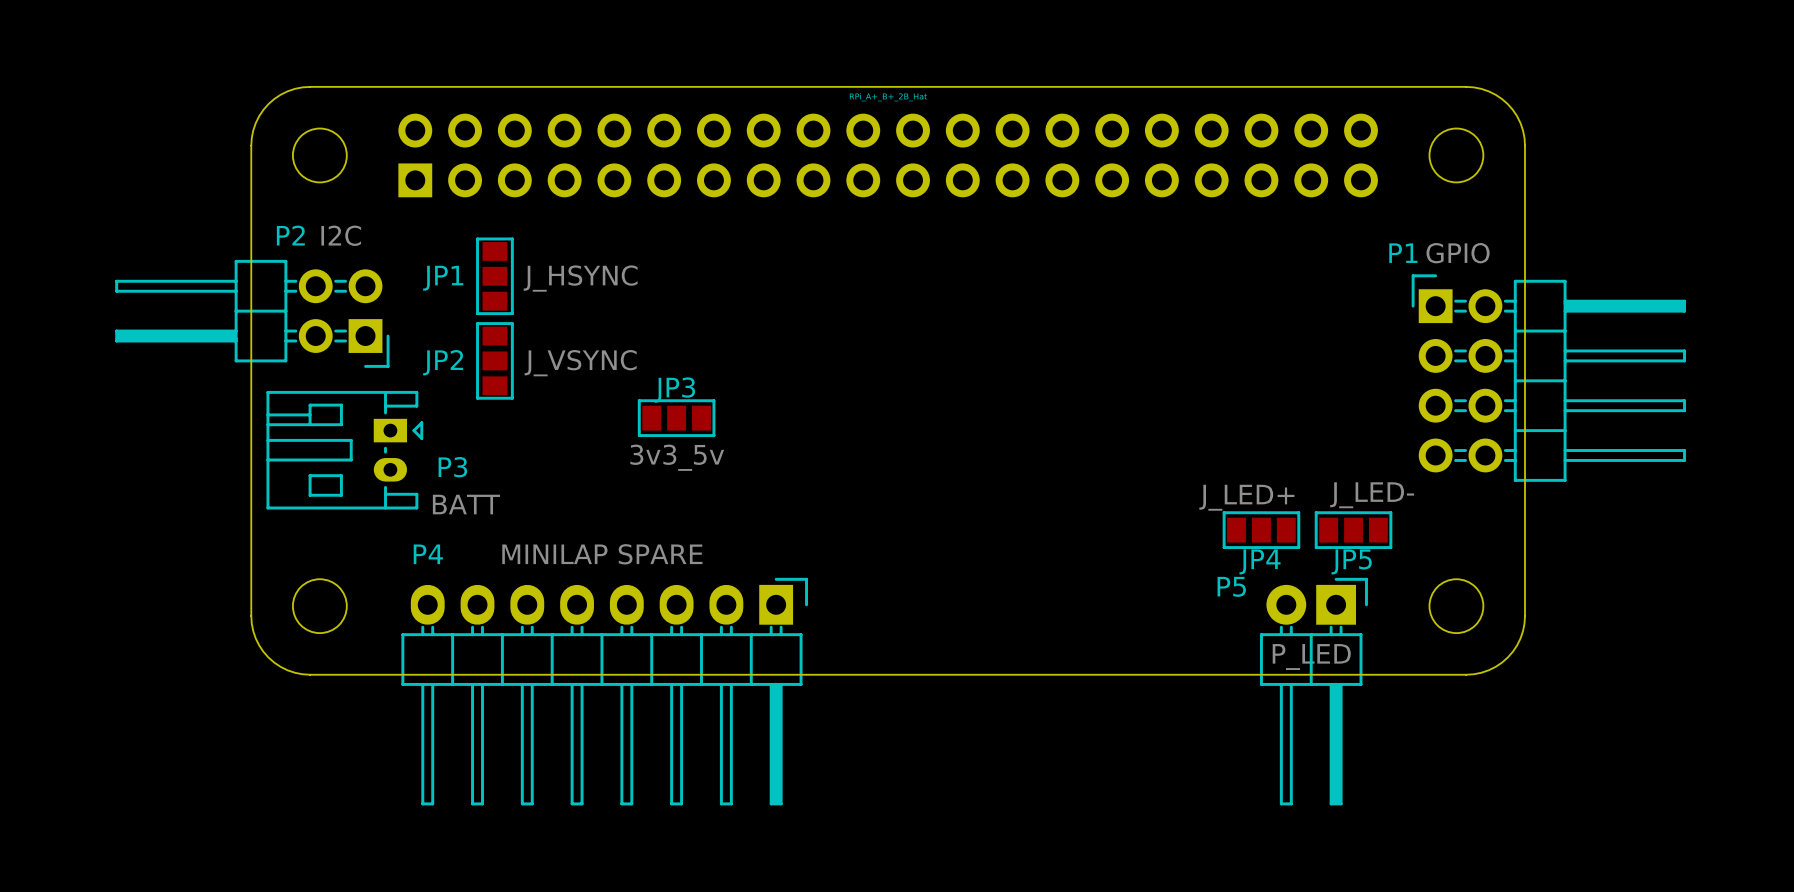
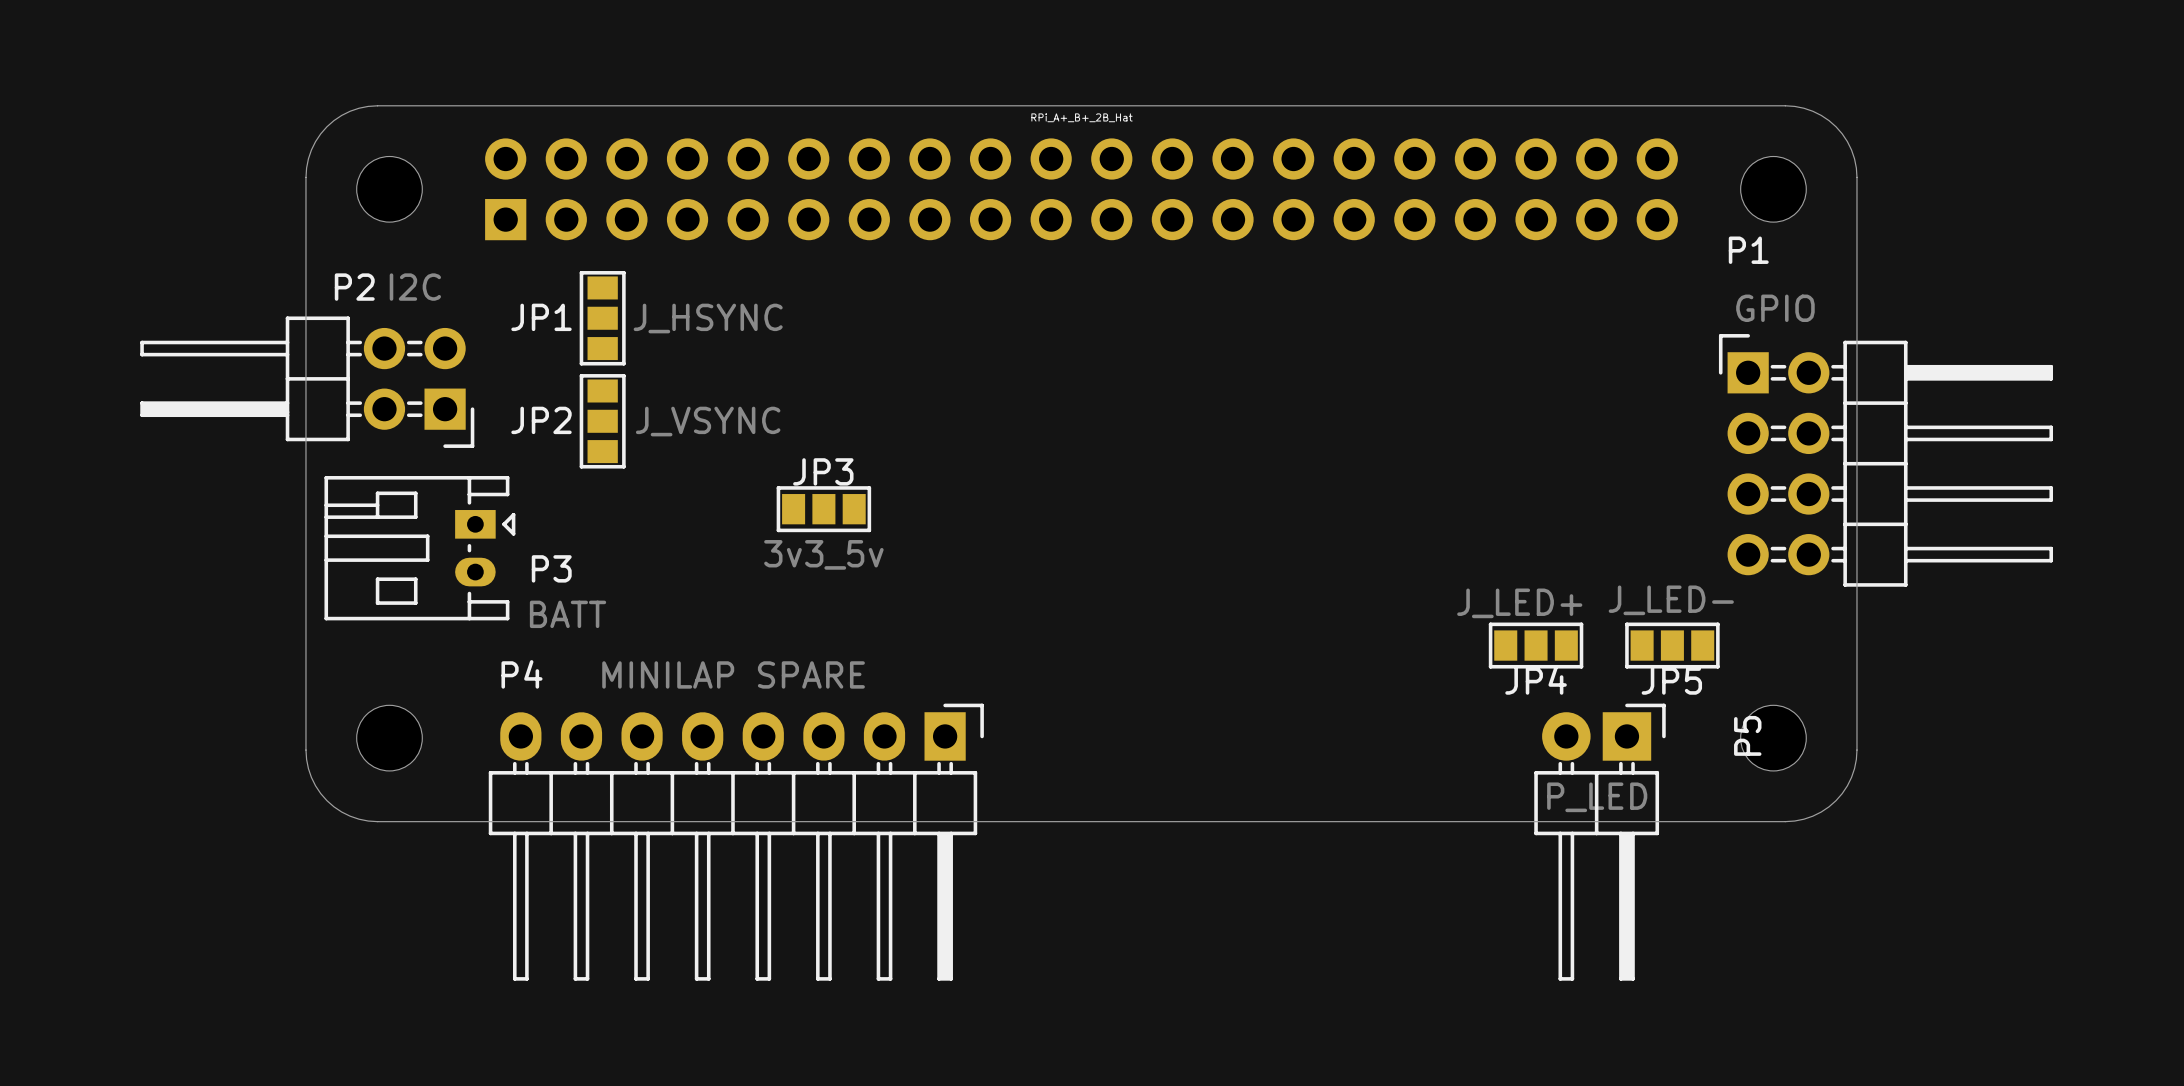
P1 name position: P1 (1403, 253) -> P1 (1748, 250)
JP1 position: (494, 276) -> (602, 318)
JP2 position: (494, 360) -> (602, 421)
JP5 position: (1353, 530) -> (1672, 645)
P5 name rotation: 0° (1231, 586) -> 90° counterclockwise (1747, 735)
P5 name position: P5 (1231, 586) -> P5 (1747, 735)

